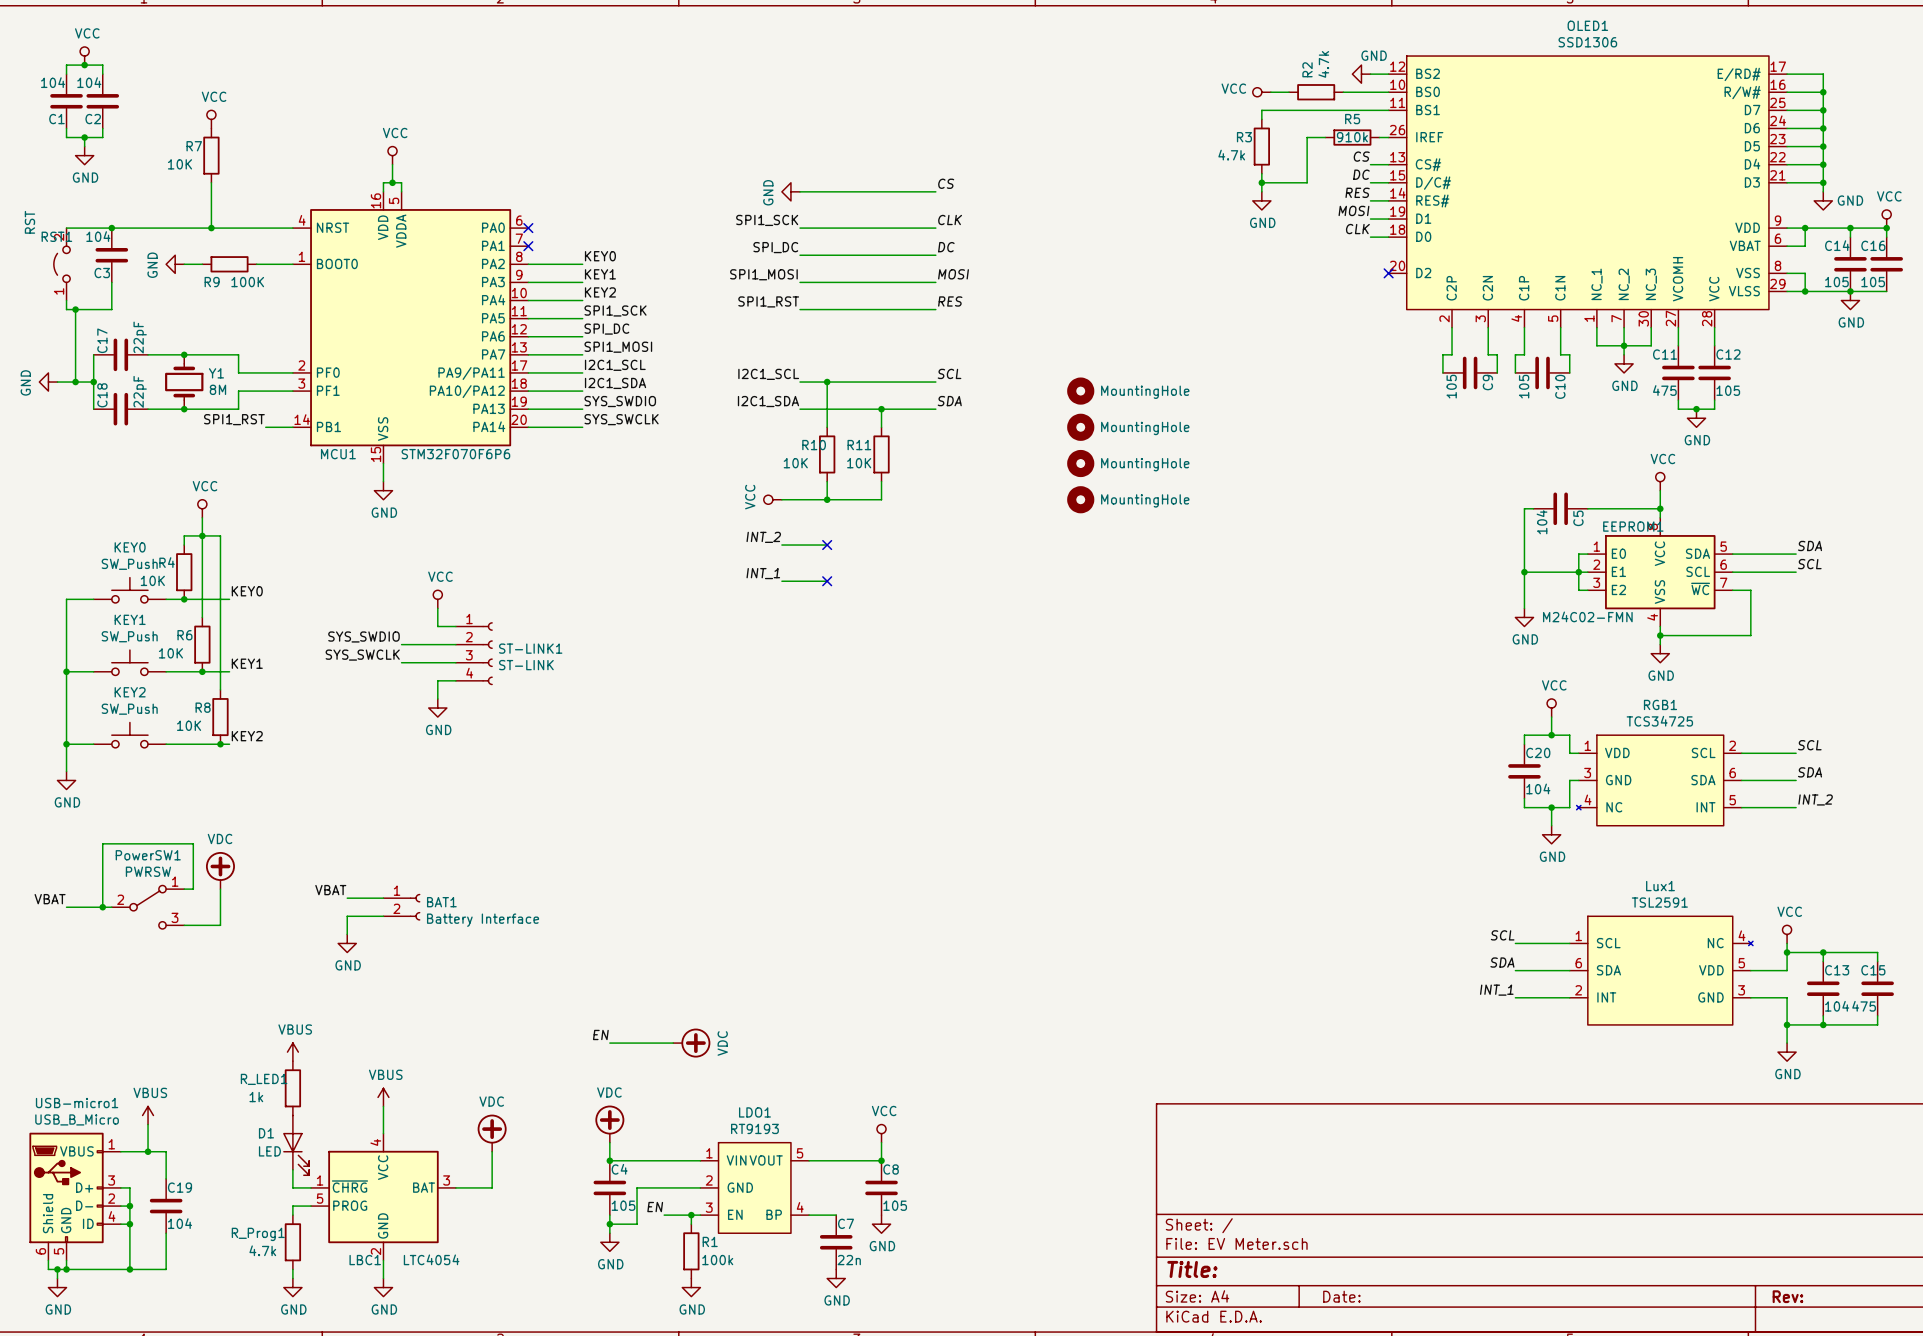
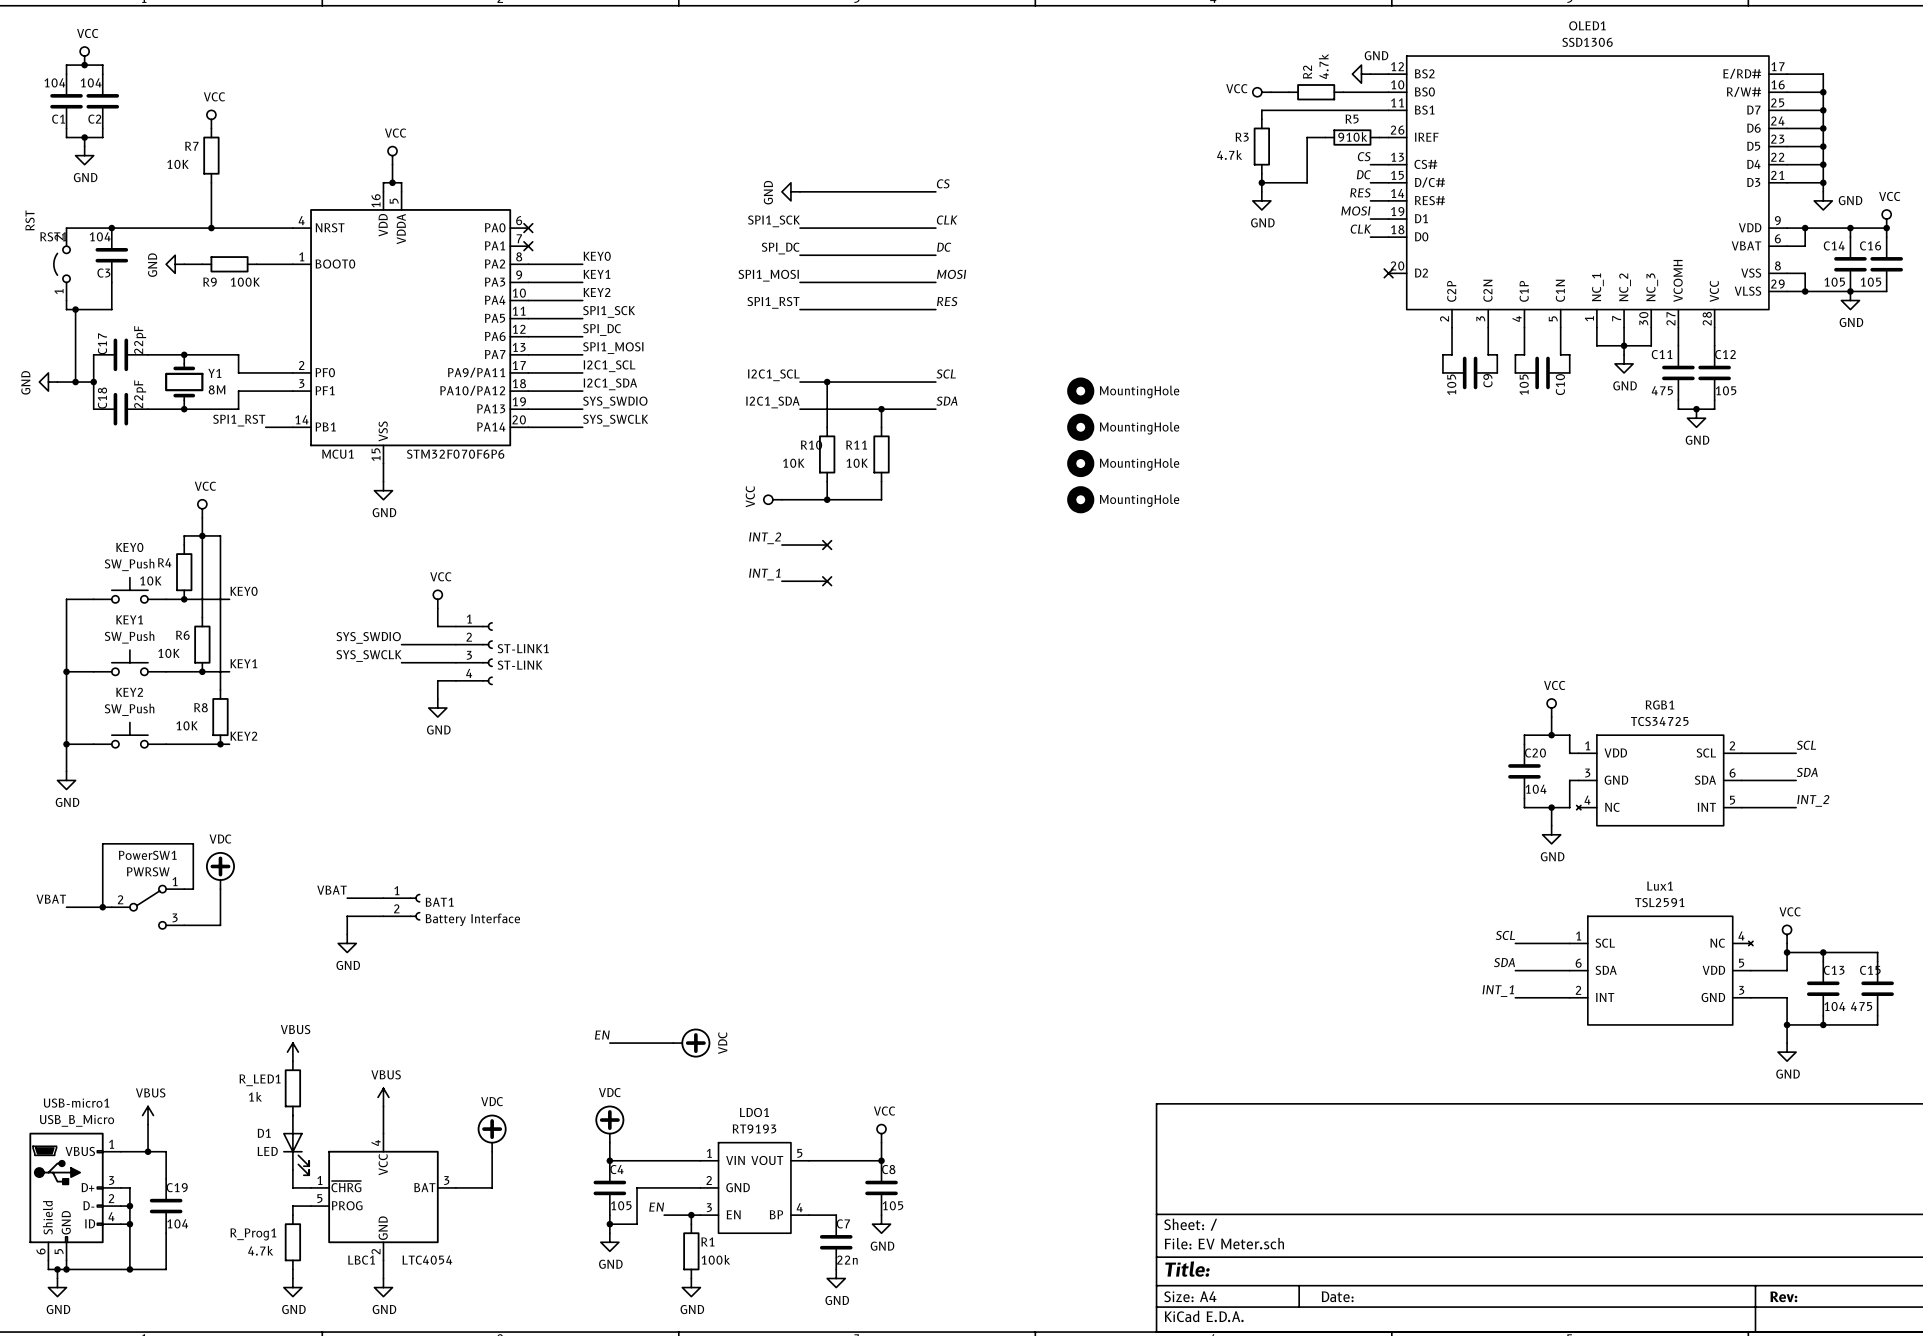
power symbol: VCC (1660, 481) -> none
wire: (1660, 490) (1660, 517) -> none
wire: (1533, 508) (1524, 508) (1524, 608) -> none
C5: 104 (1560, 508) -> none
wire: (1587, 508) (1660, 508) -> none
junction: (1660, 508) -> none
label: SDA (1810, 545) -> none
wire: (1587, 554) (1578, 554) (1578, 590) (1587, 590) -> none
wire: (1732, 554) (1796, 554) -> none
label: SCL (1809, 564) -> none
wire: (1524, 572) (1587, 572) -> none
junction: (1524, 572) -> none
junction: (1578, 572) -> none
EEPROM1: M24C02-FMN (1660, 572) -> none
wire: (1732, 572) (1796, 572) -> none
wire: (1732, 590) (1750, 590) (1750, 635) (1660, 635) -> none
power symbol: GND (1524, 617) -> none
wire: (1660, 626) (1660, 644) -> none
junction: (1660, 635) -> none
power symbol: GND (1660, 653) -> none

